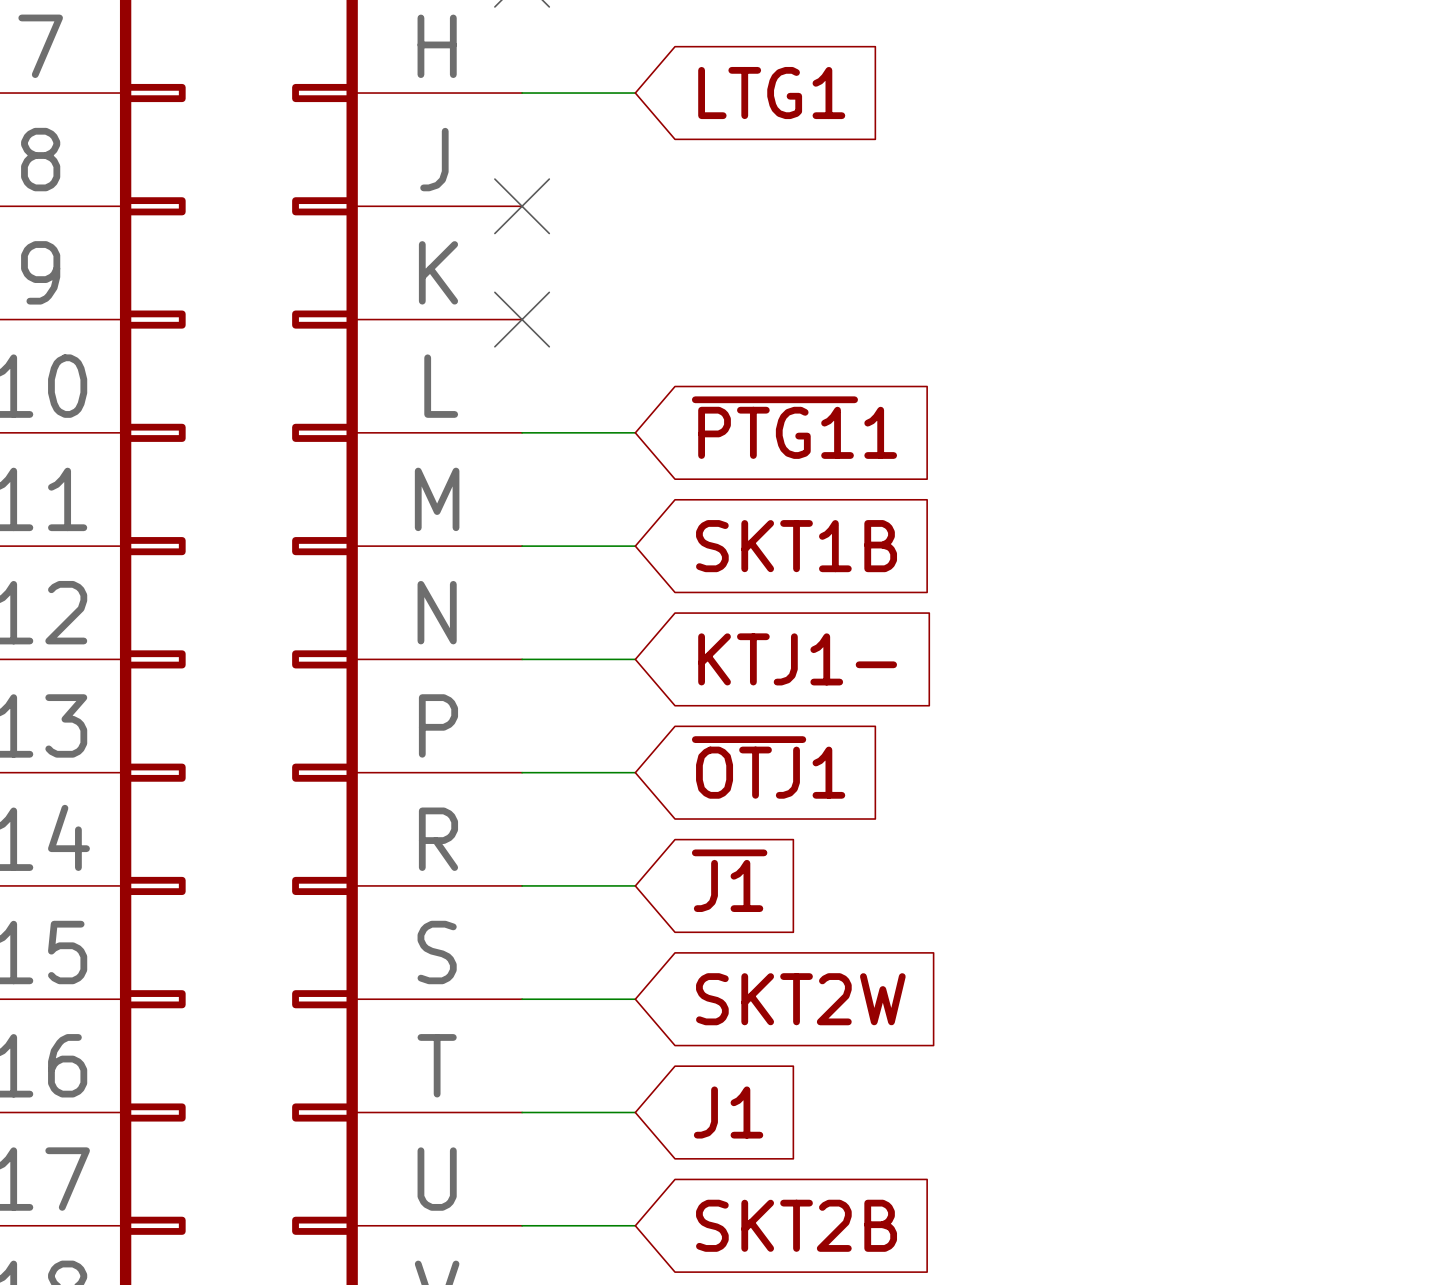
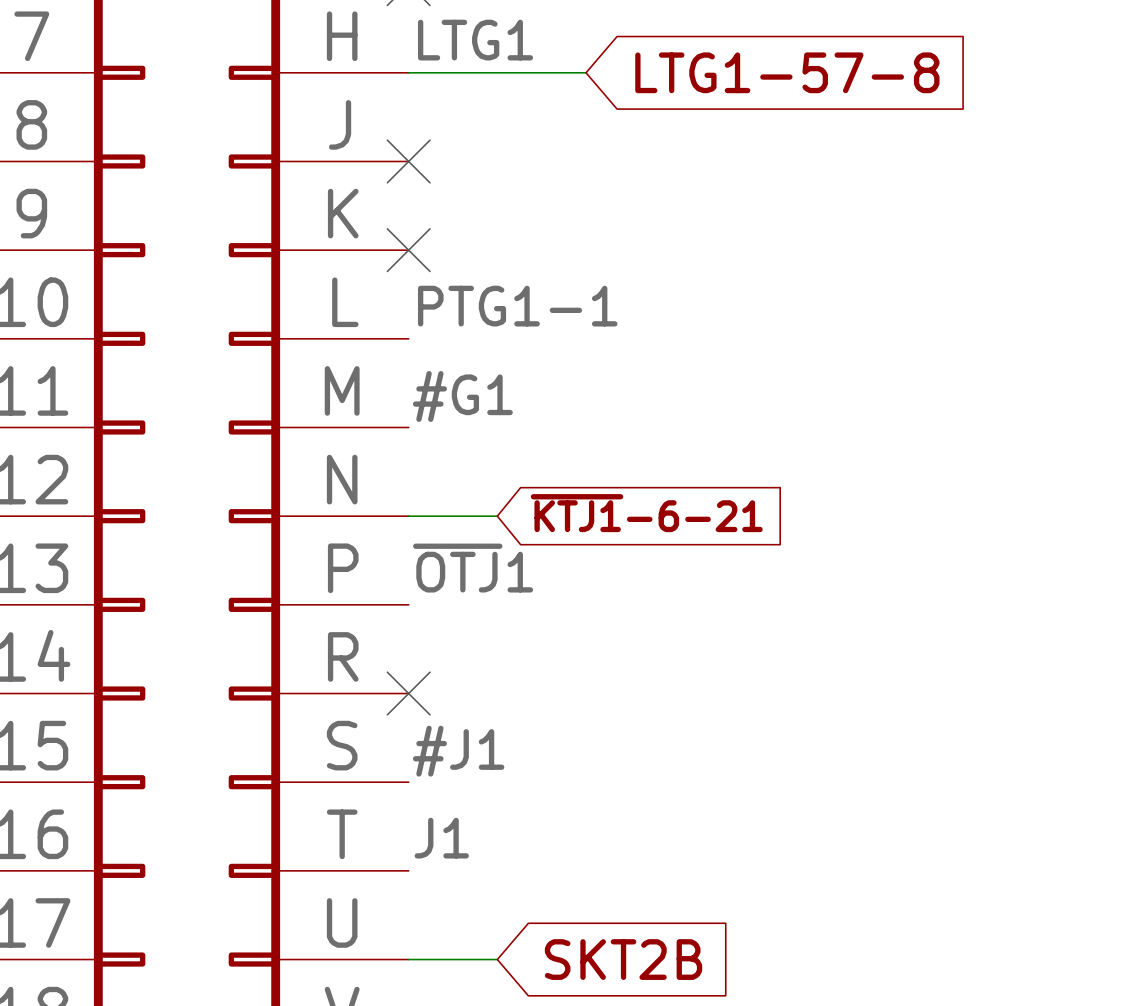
label: none -> LTG1 (475, 40)
global label: LTG1 (771, 93) -> LTG1-57-8 (787, 72)
label: none -> PTG1-1 (517, 306)
global label: ~{PTG1}1 (794, 427) -> none
wire: (522, 432) (635, 432) -> (497, 72) (586, 72)
label: none -> #G1 (462, 396)
wire: (522, 546) (635, 546) -> none
global label: SKT1B (796, 546) -> none
global label: KTJ1- (797, 659) -> ~{KTJ1}-6-21 (646, 513)
label: none -> ~{OTJ}1 (473, 568)
global label: ~{OTJ}1 (768, 767) -> none
wire: (522, 772) (635, 772) -> none
global label: ~{J1} (729, 880) -> none
wire: (522, 885) (635, 885) -> none
no-connect mark: none -> (408, 693)
label: none -> #J1 (458, 751)
wire: (522, 999) (635, 999) -> none
global label: SKT2W (800, 999) -> none
label: none -> J1 (441, 838)
wire: (522, 1112) (635, 1112) -> none
global label: J1 (728, 1112) -> none

